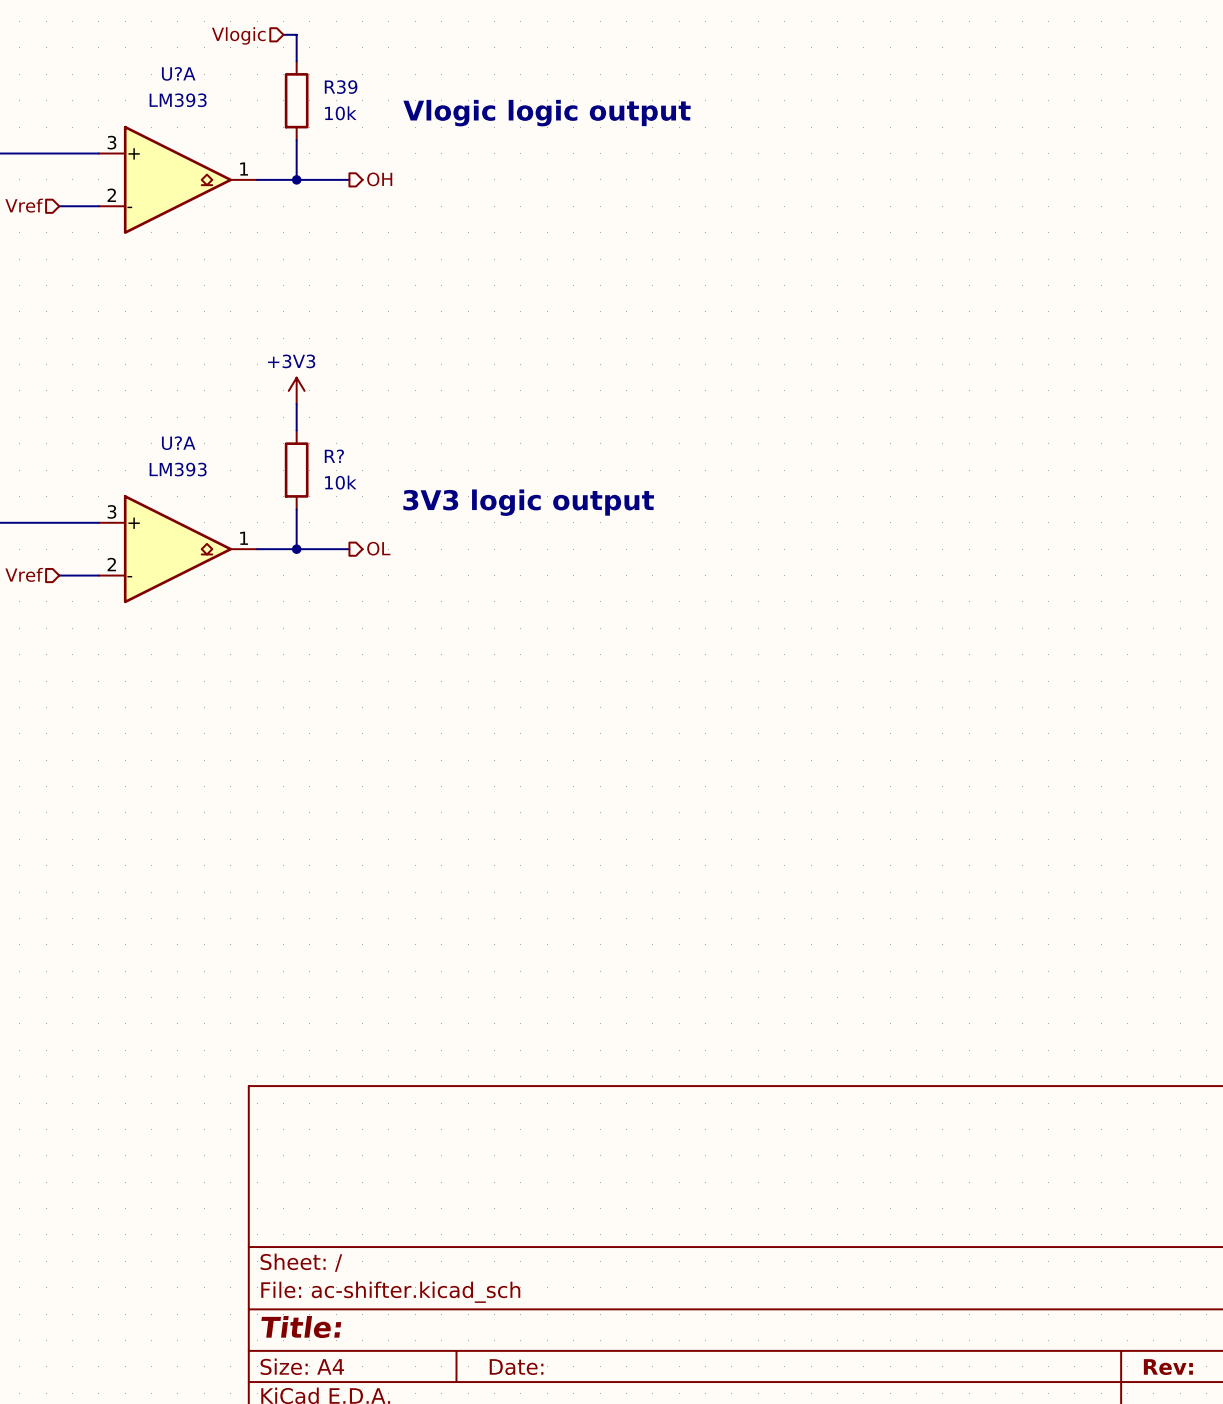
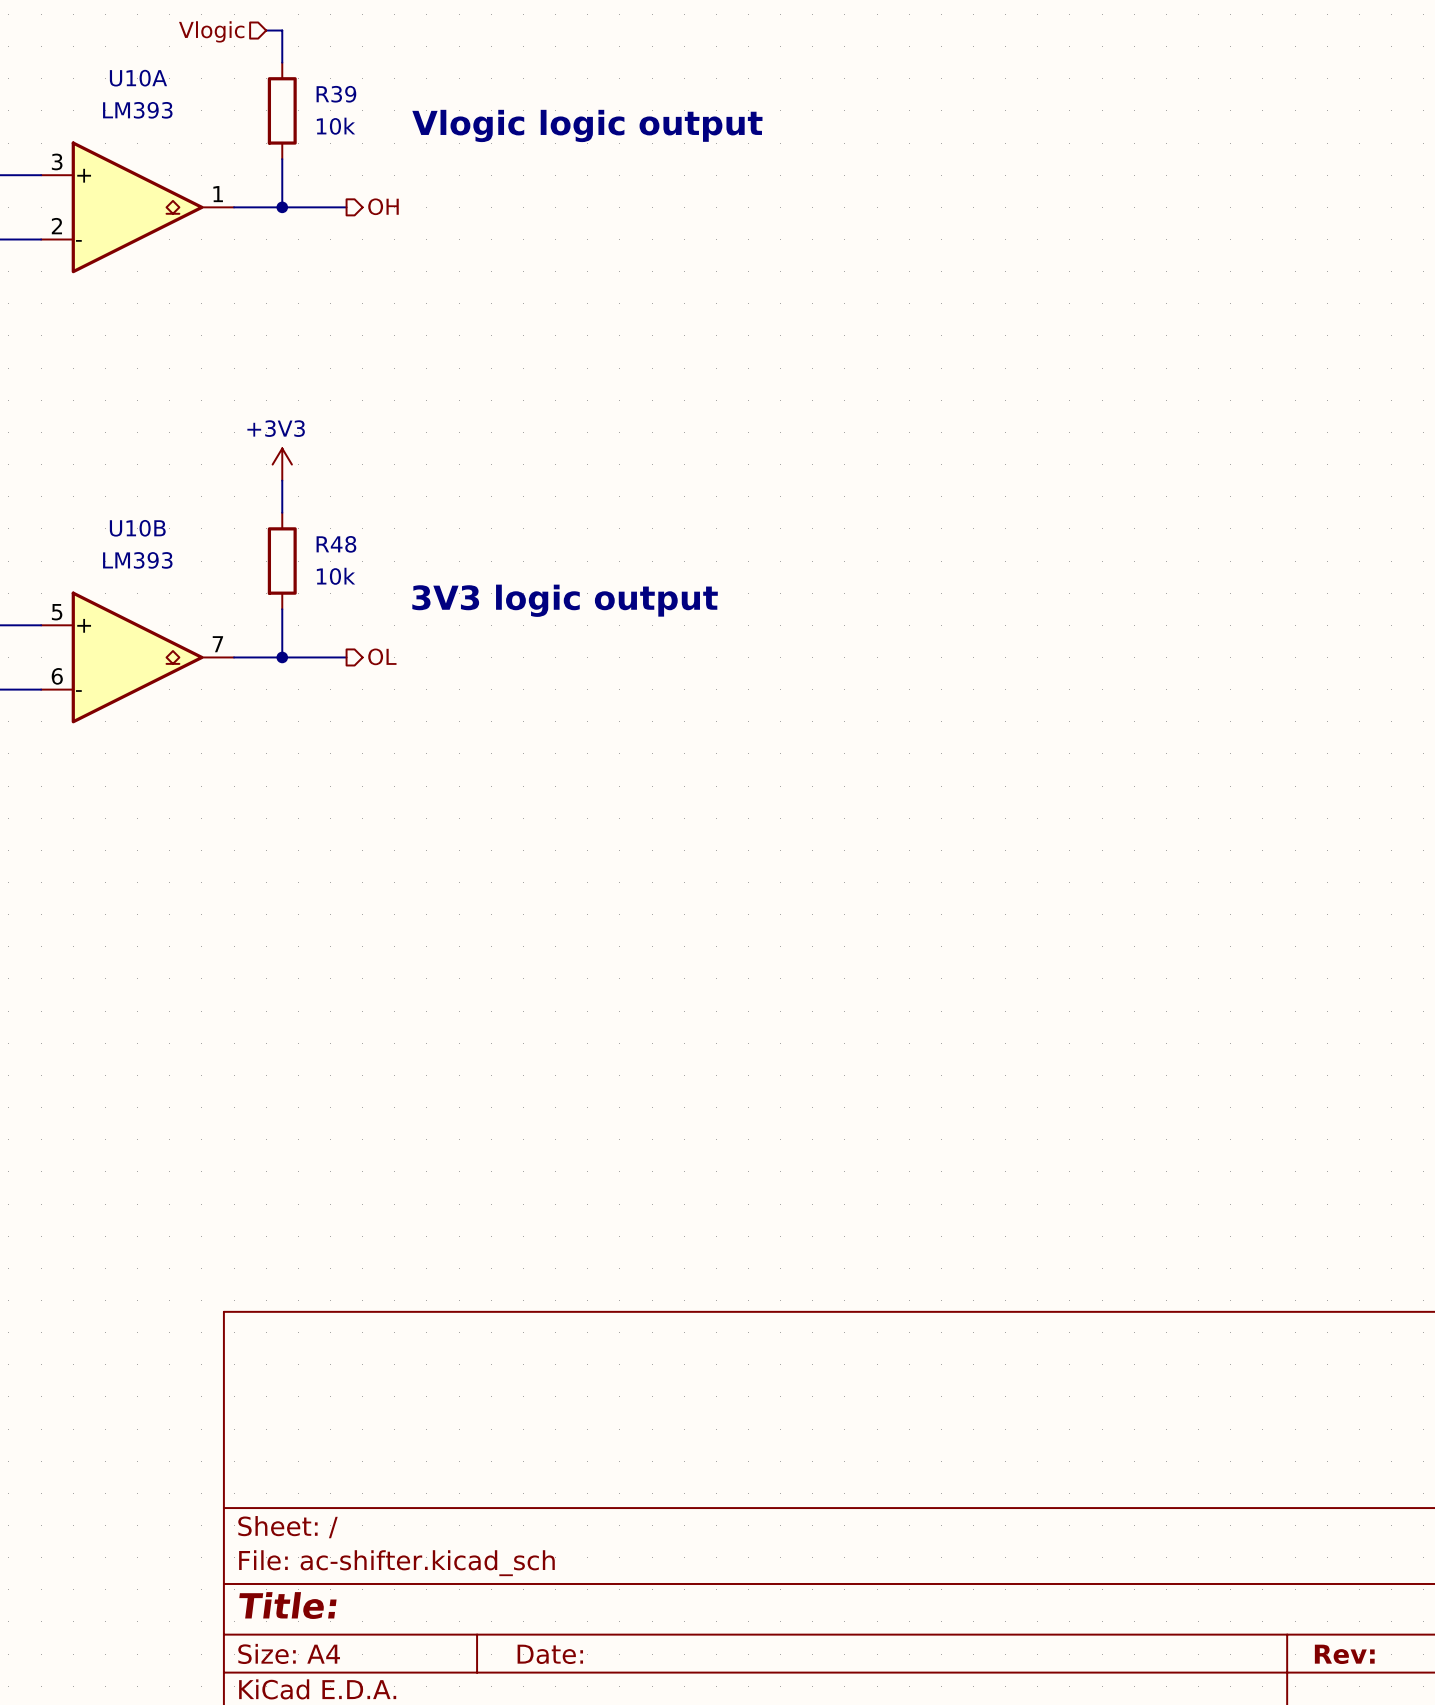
U?A name: U?A (178, 73) -> U10A (138, 78)
U?A name: U?A (178, 443) -> U10B (137, 528)
R? name: R? (334, 456) -> R48 (336, 544)
U?A pin number: 3 (111, 511) -> 5 (57, 612)
U?A pin number: 1 (244, 538) -> 7 (217, 644)
U?A pin number: 2 (111, 564) -> 6 (57, 676)

